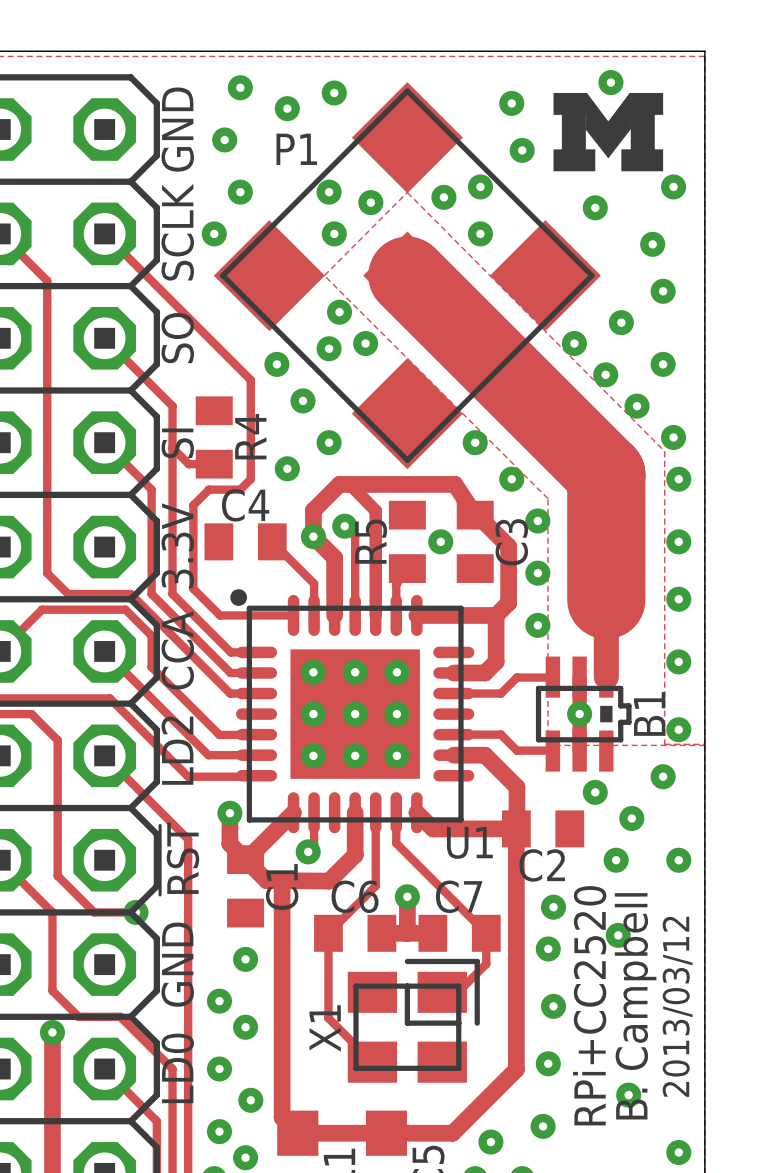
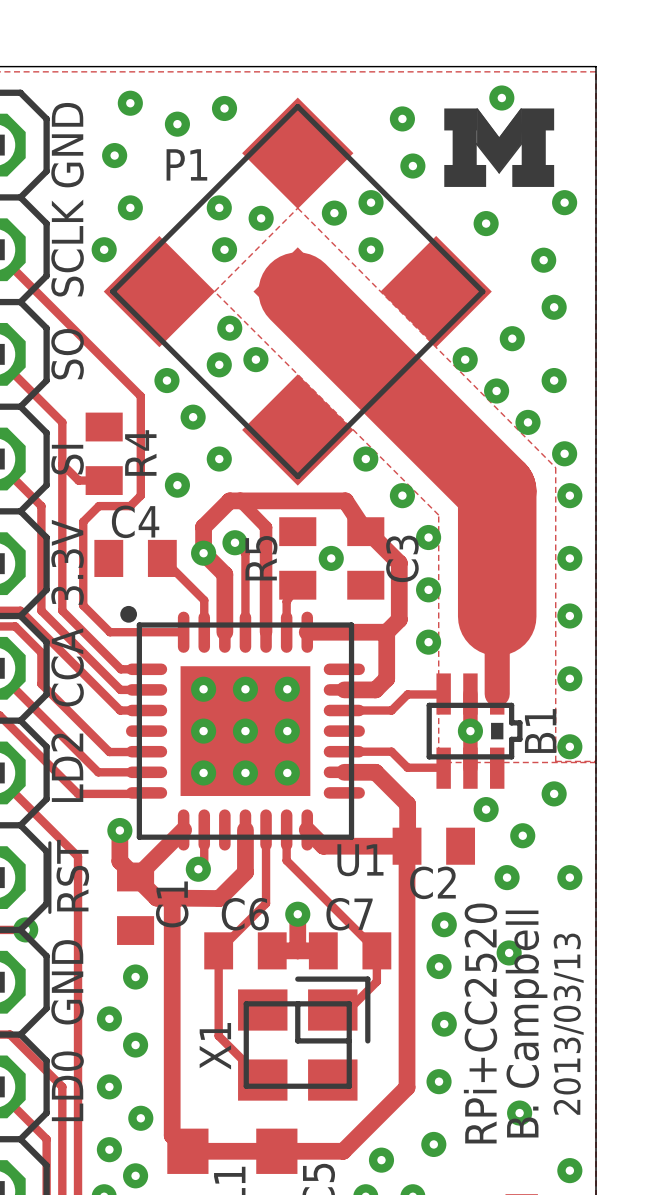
text: 2013/03/12 (677, 1006) -> 2013/03/13 (568, 1024)

